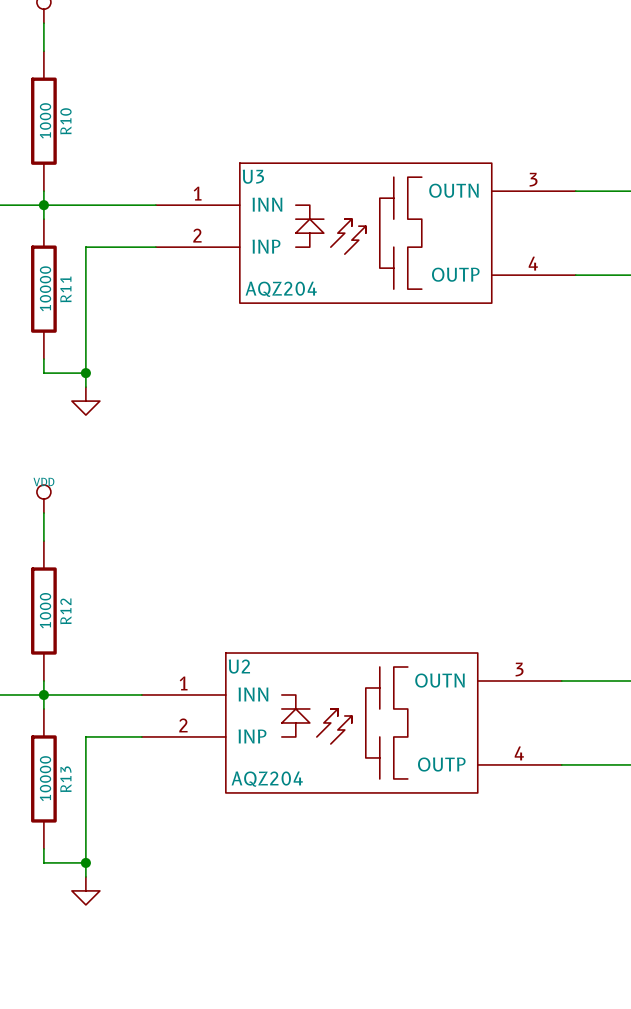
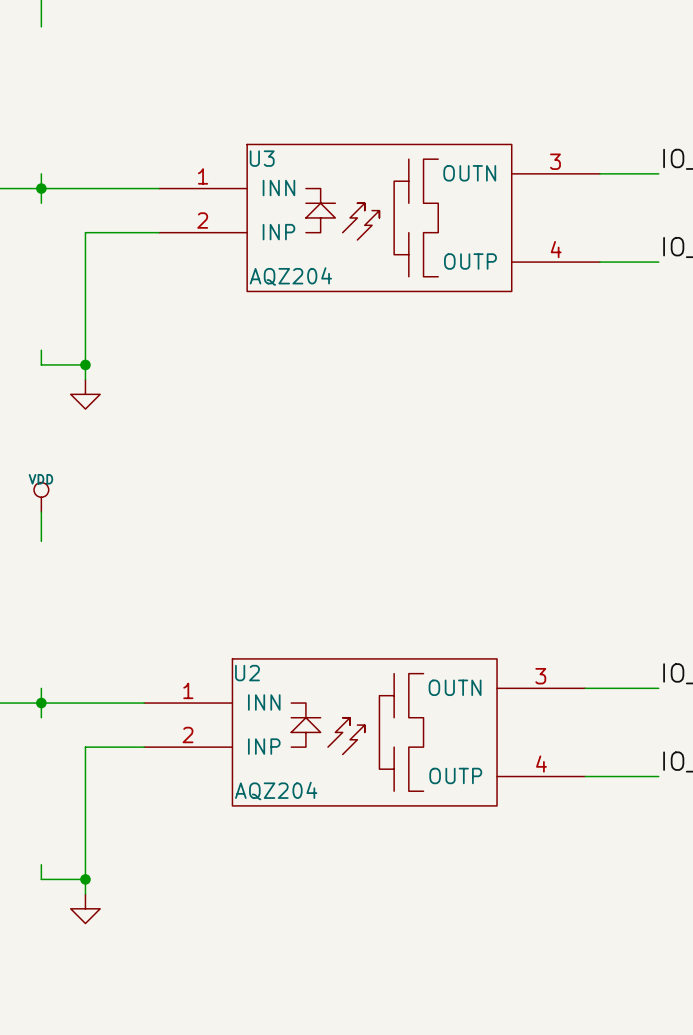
R10: 1000 (43, 121) -> none
R11: 10000 (43, 289) -> none
R12: 1000 (43, 611) -> none
R13: 10000 (43, 778) -> none

